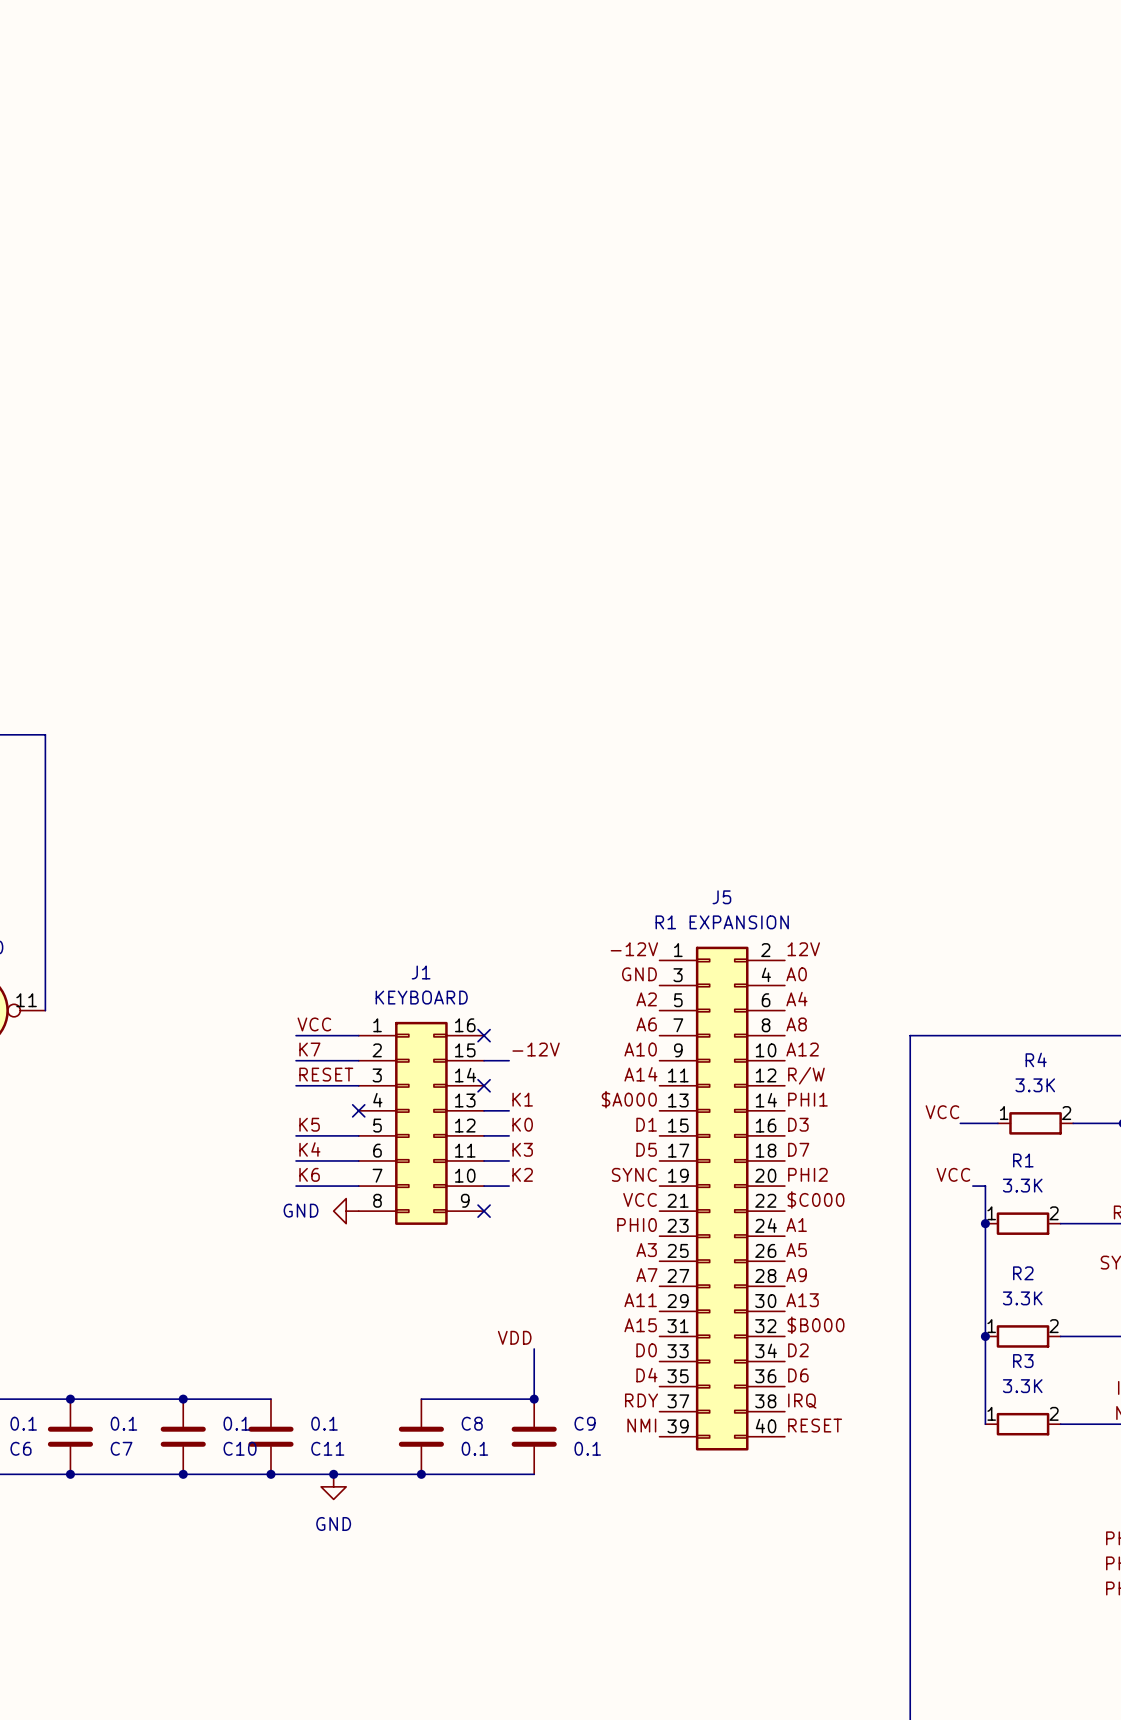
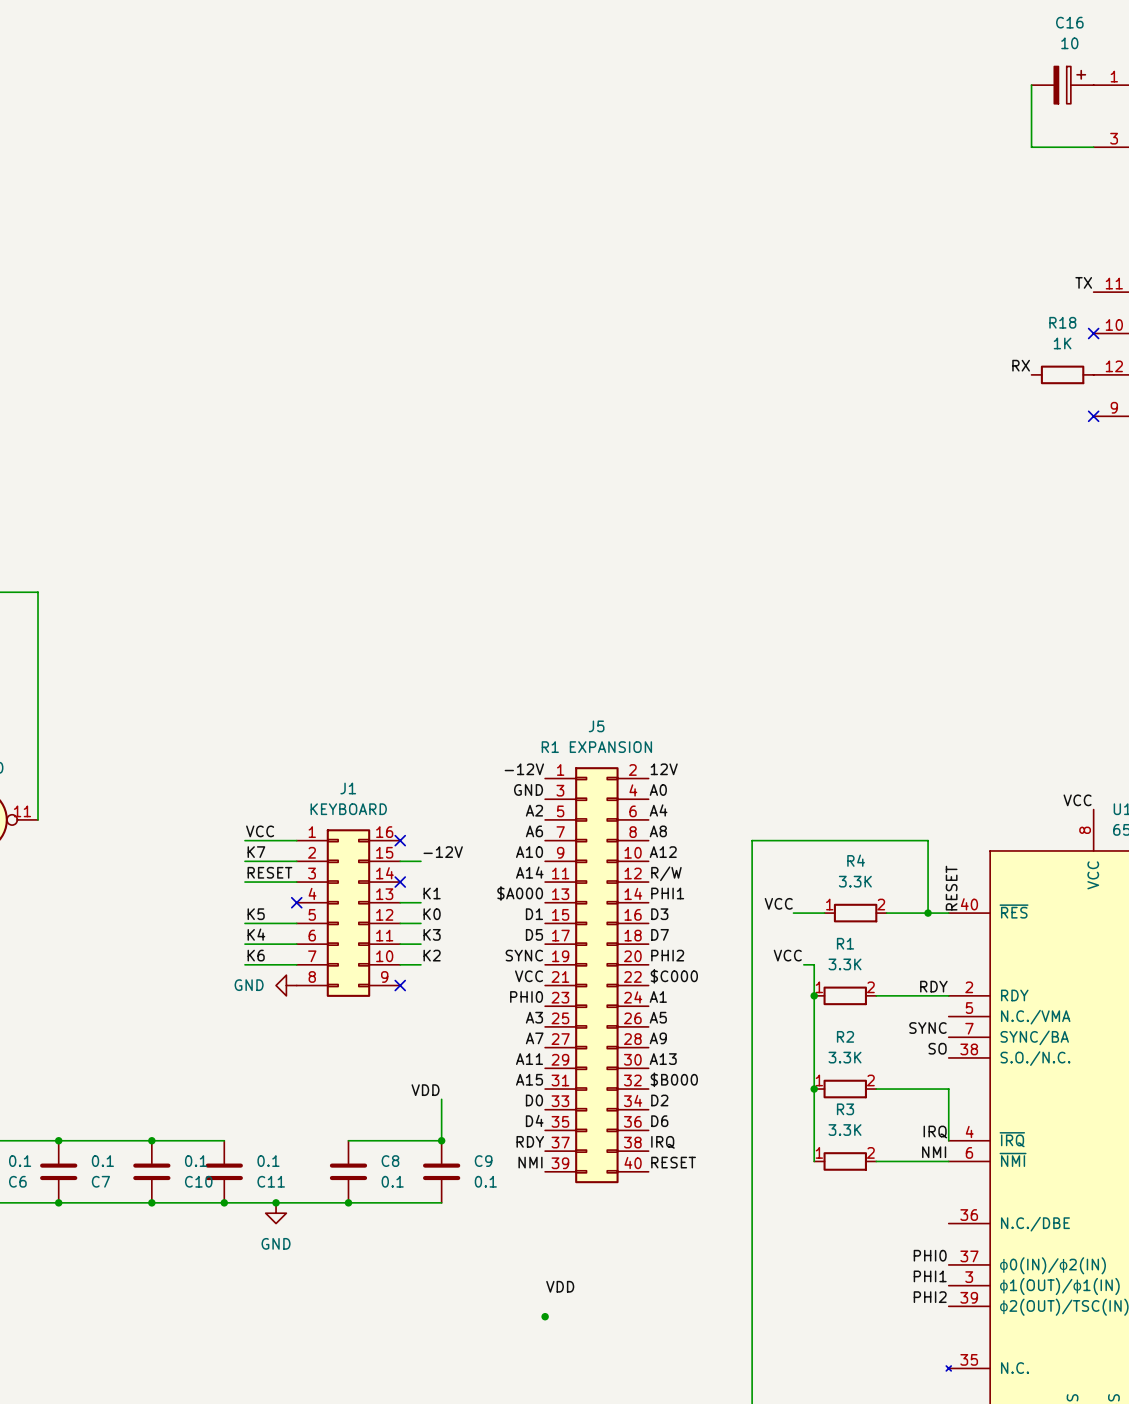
label: none -> VDD (560, 1286)
junction: none -> (545, 1316)

